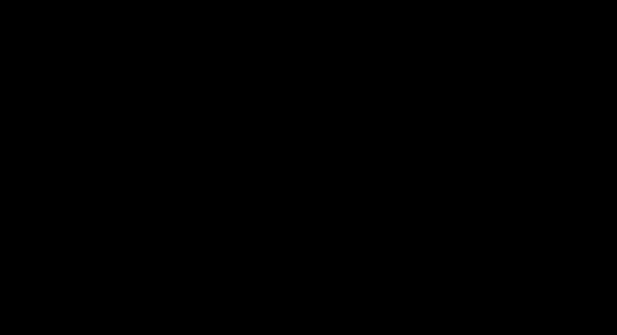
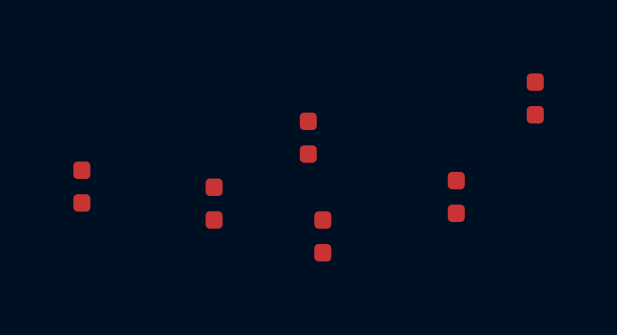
part: none -> (535, 98)
part: none -> (308, 137)
part: none -> (81, 186)
part: none -> (456, 196)
part: none -> (214, 203)
part: none -> (322, 236)

